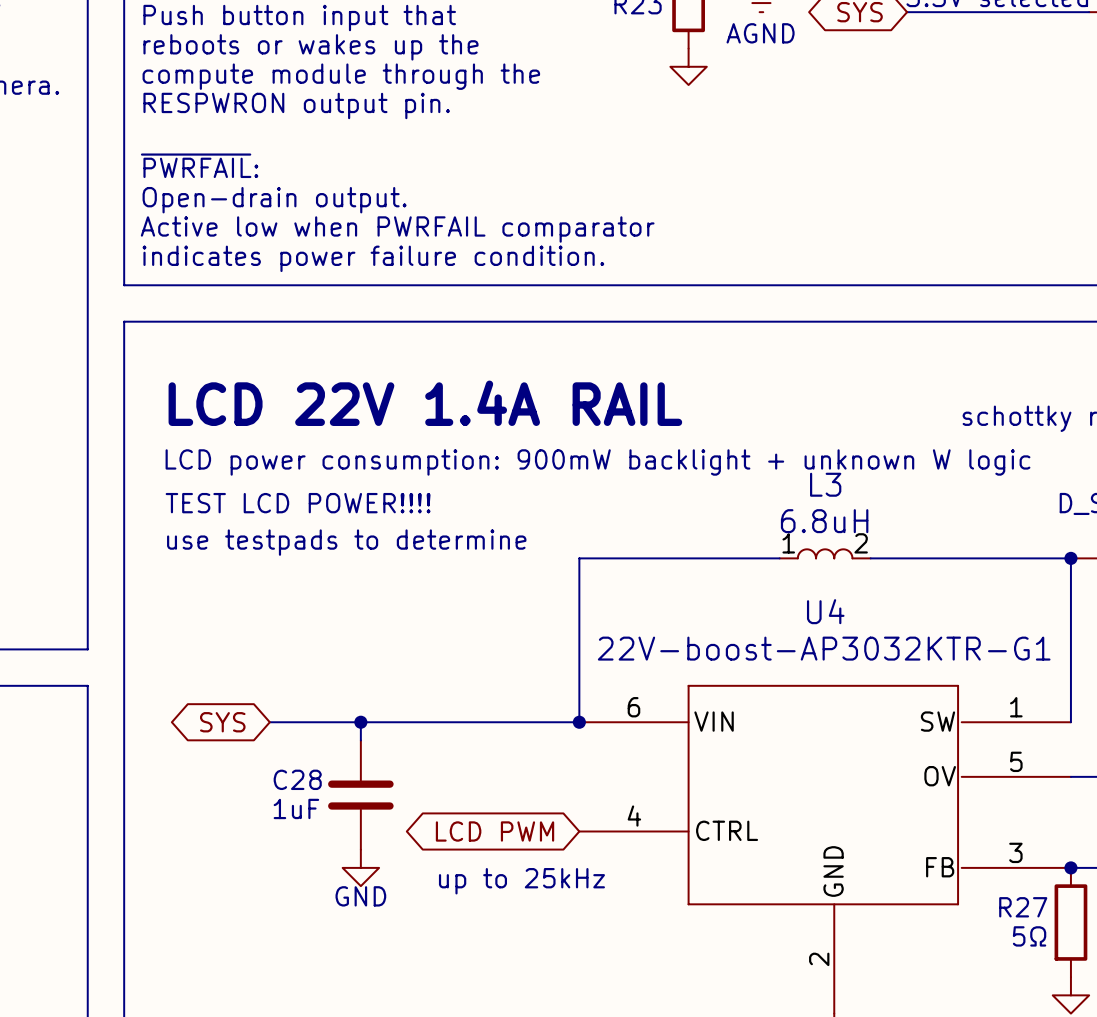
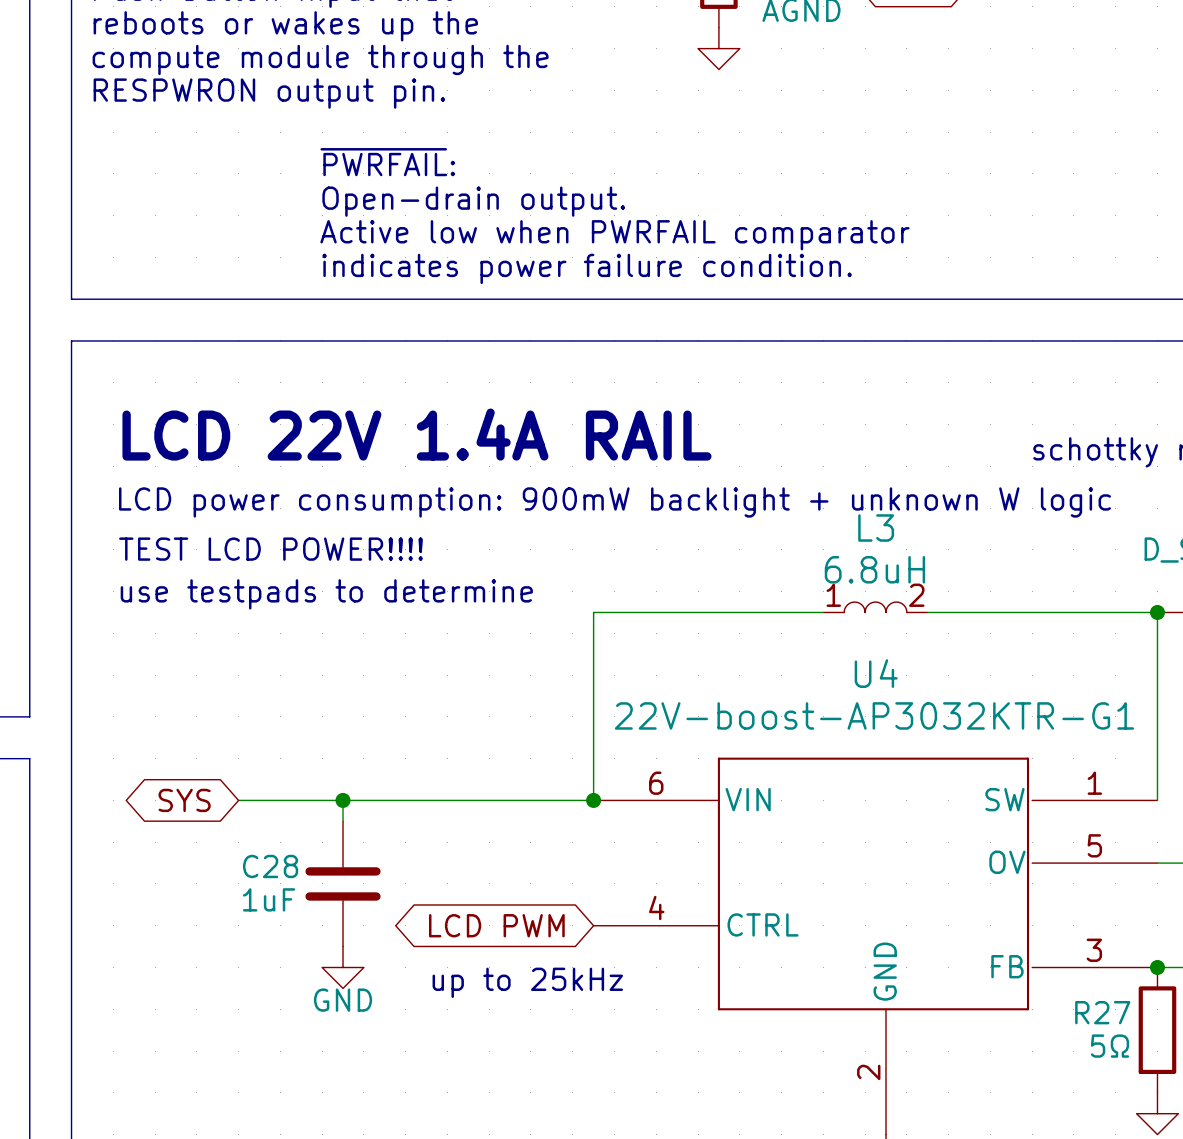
text position: ~{PWRFAIL}: (199, 165) -> ~{PWRFAIL}: (387, 162)
text position: Open-drain output. (274, 200) -> Open-drain output. (473, 201)
text position: Active low when PWRFAIL comparator (397, 229) -> Active low when PWRFAIL comparator (614, 235)
text position: indicates power failure condition. (373, 258) -> indicates power failure condition. (587, 268)

